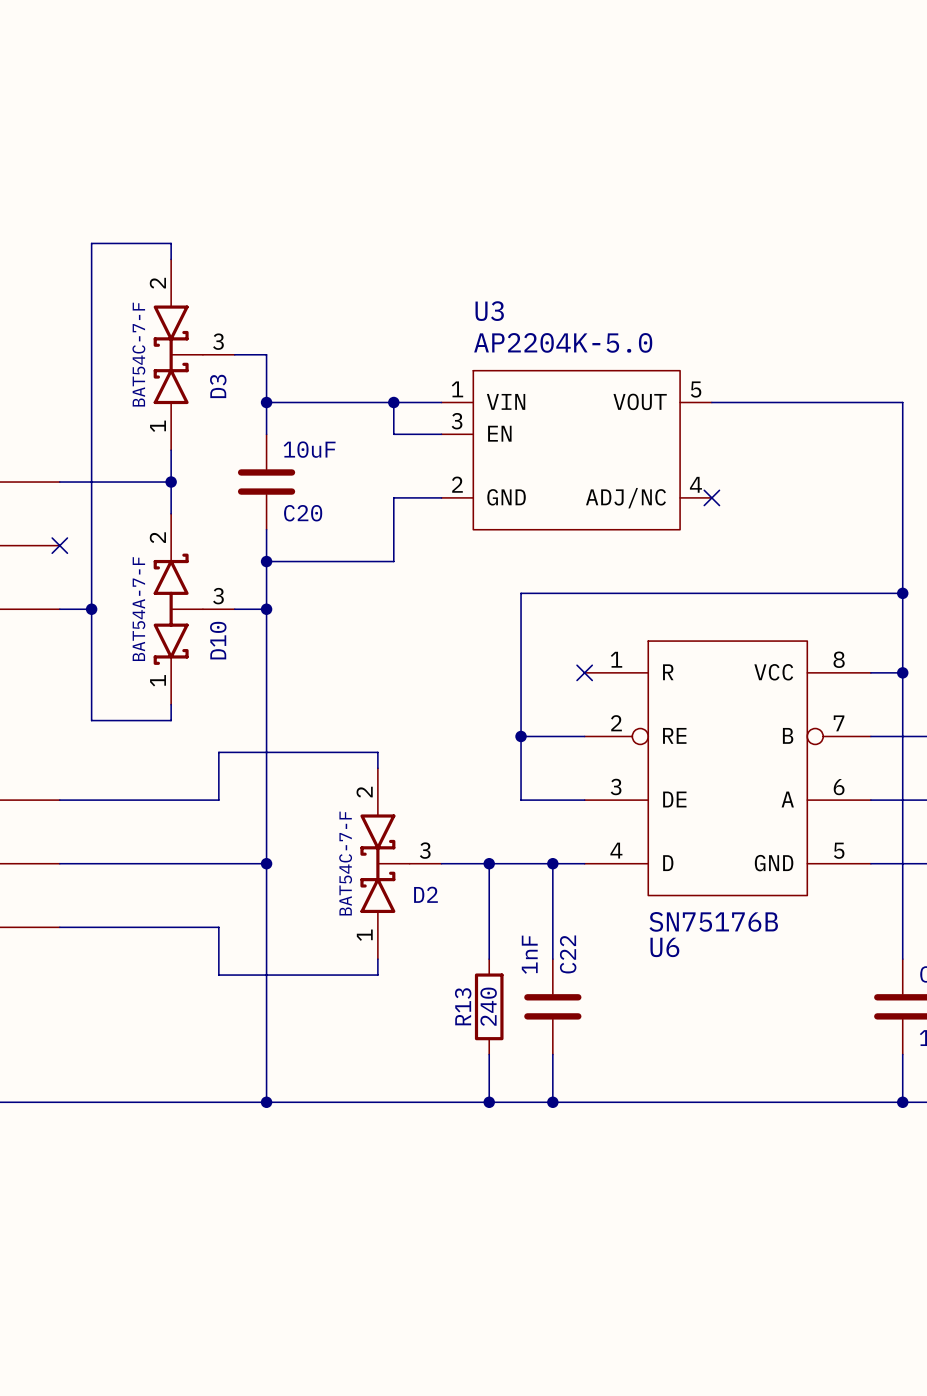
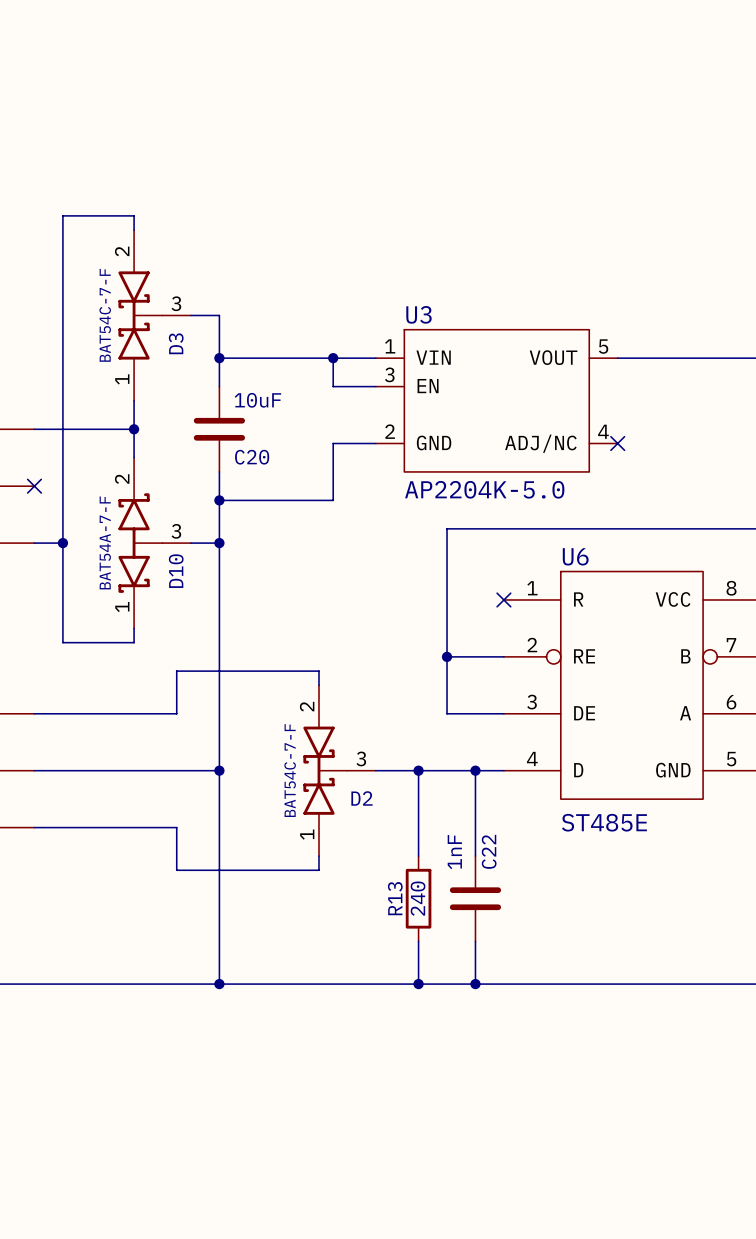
U3 name position: U3 (489, 311) -> U3 (418, 314)
U3 value position: AP2204K-5.0 (563, 342) -> AP2204K-5.0 (484, 489)
U6 value: SN75176B (713, 921) -> ST485E (604, 822)
U6 name position: U6 (664, 947) -> U6 (575, 556)

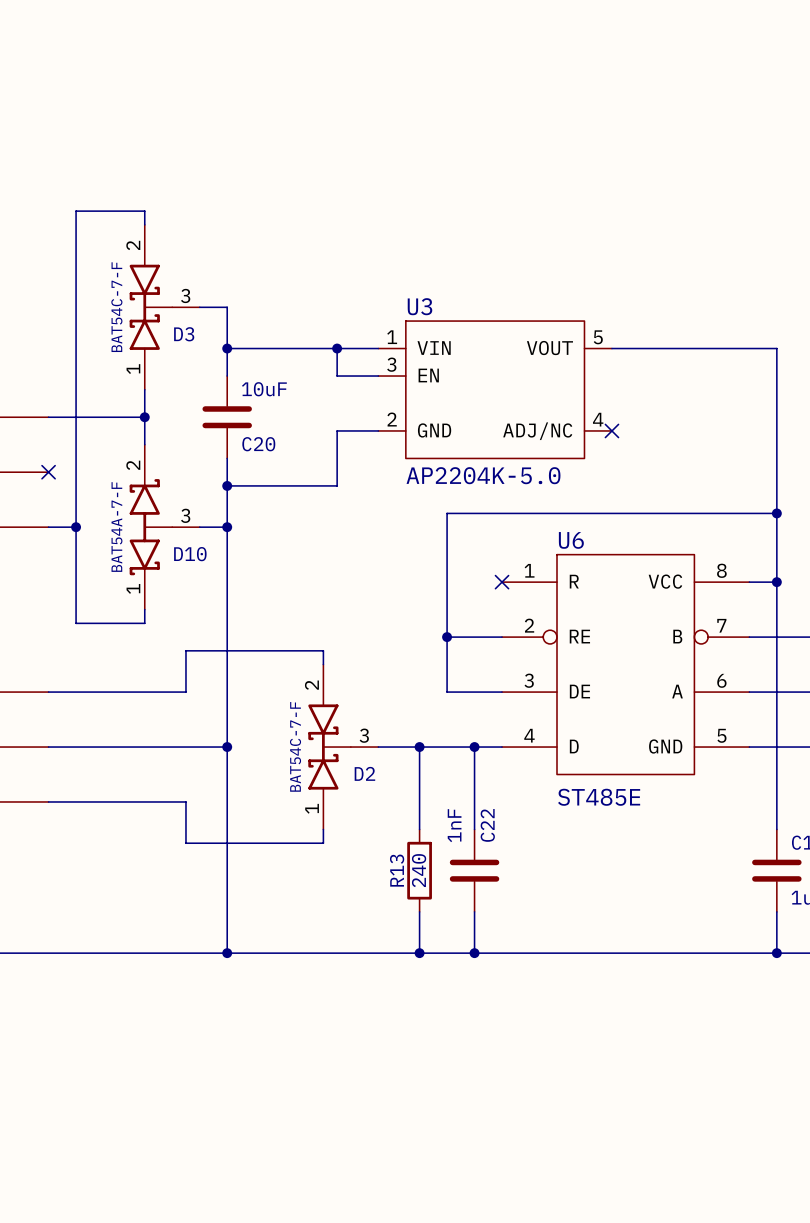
D3 name rotation: 0° (176, 343) -> 90° clockwise (184, 334)
D10 name rotation: 0° (176, 571) -> 90° clockwise (190, 554)

